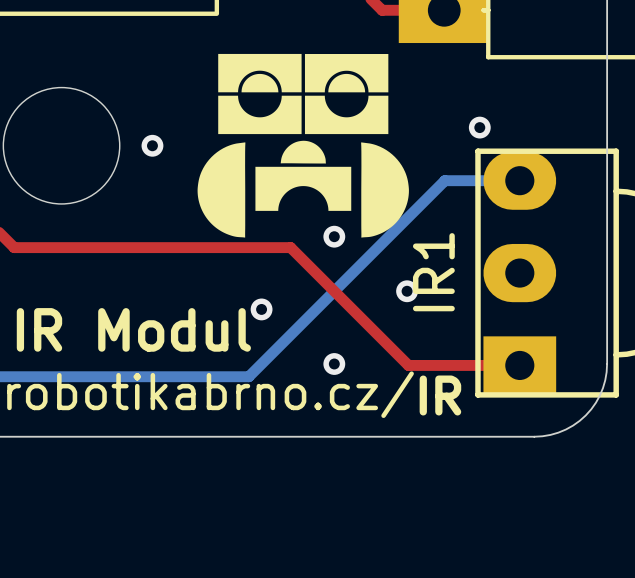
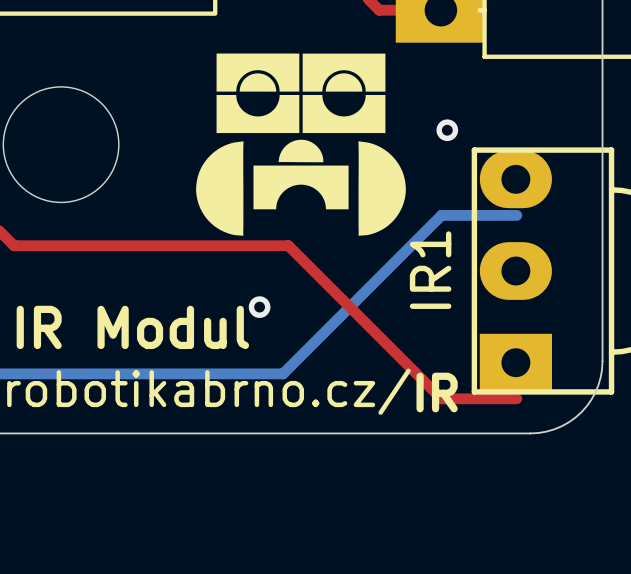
via position: (479, 127) -> (447, 130)
via: (152, 145) -> none
bottom track: (519, 180) (444, 180) (248, 376) -> (516, 215) (441, 215) (283, 373) (246, 373)
via: (334, 236) -> none
via: (407, 291) -> none
via: (334, 363) -> none
top track: (408, 365) (520, 366) -> (405, 362) (441, 398) (516, 398)

